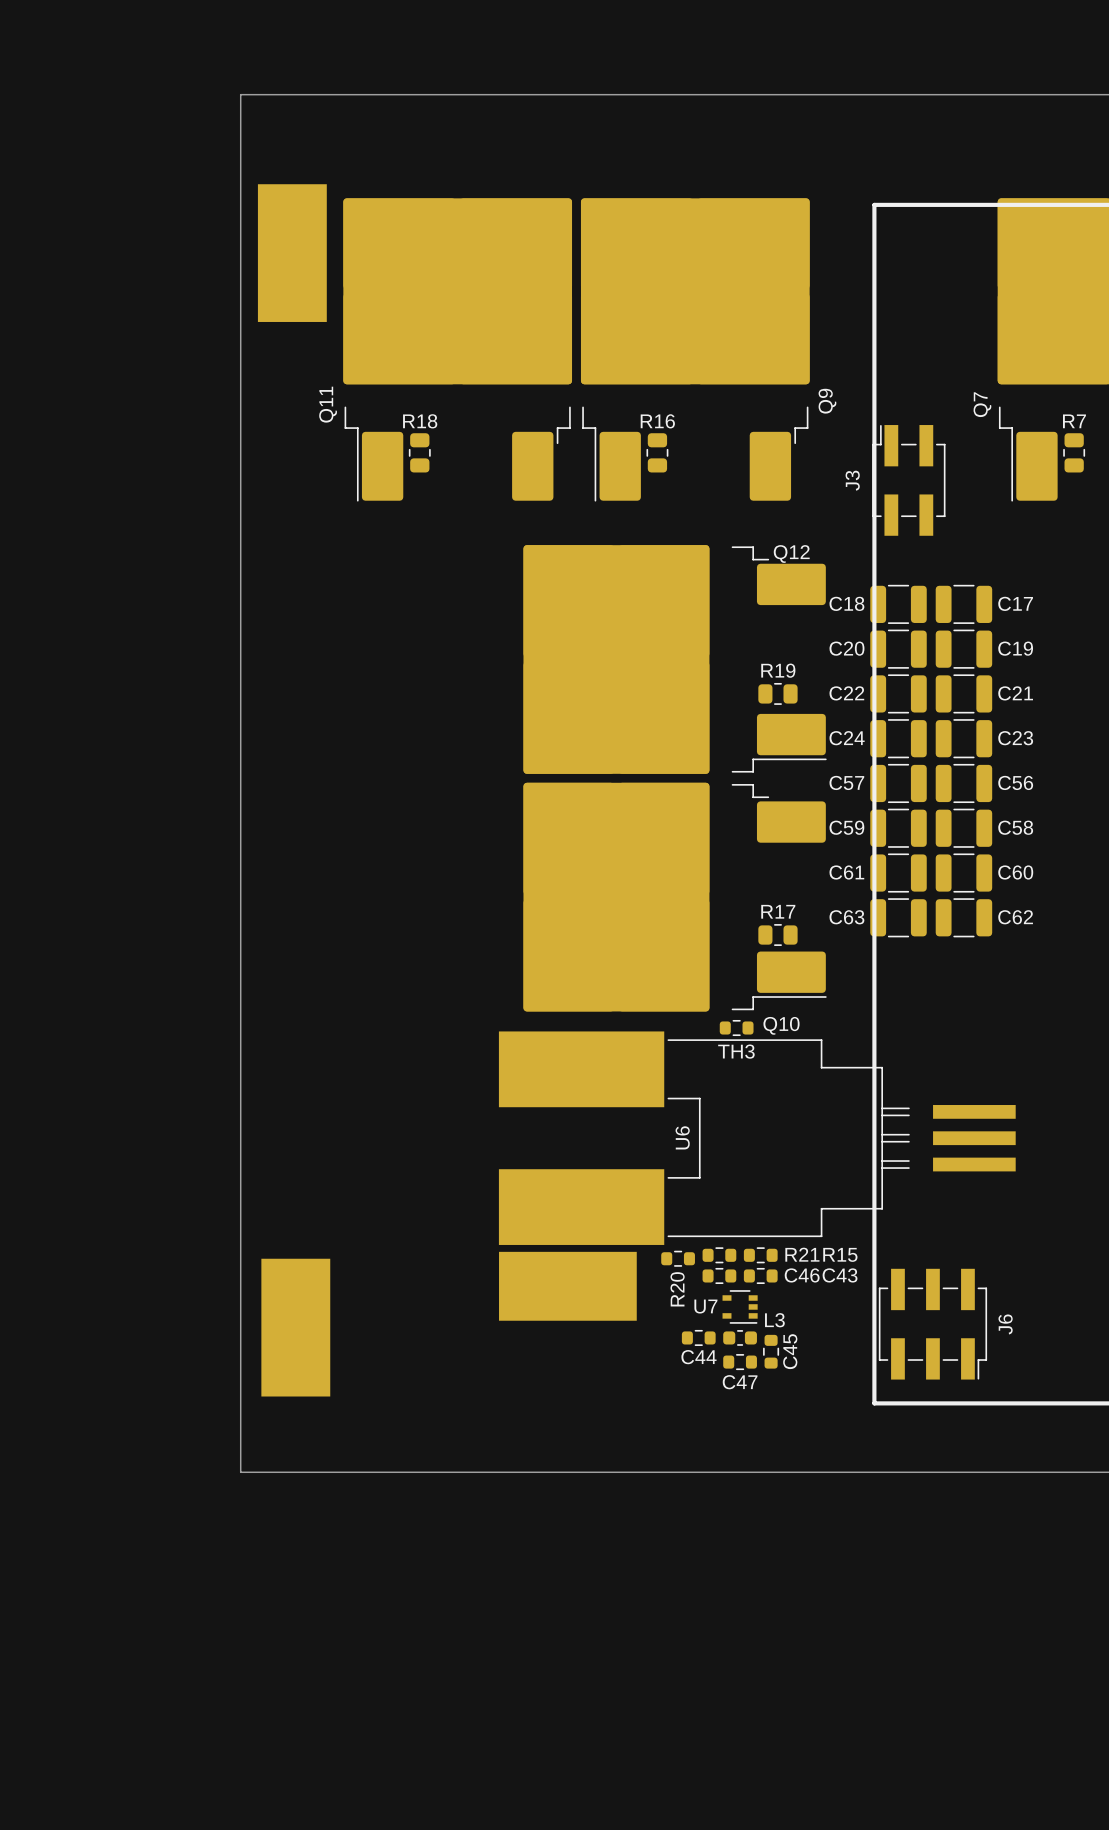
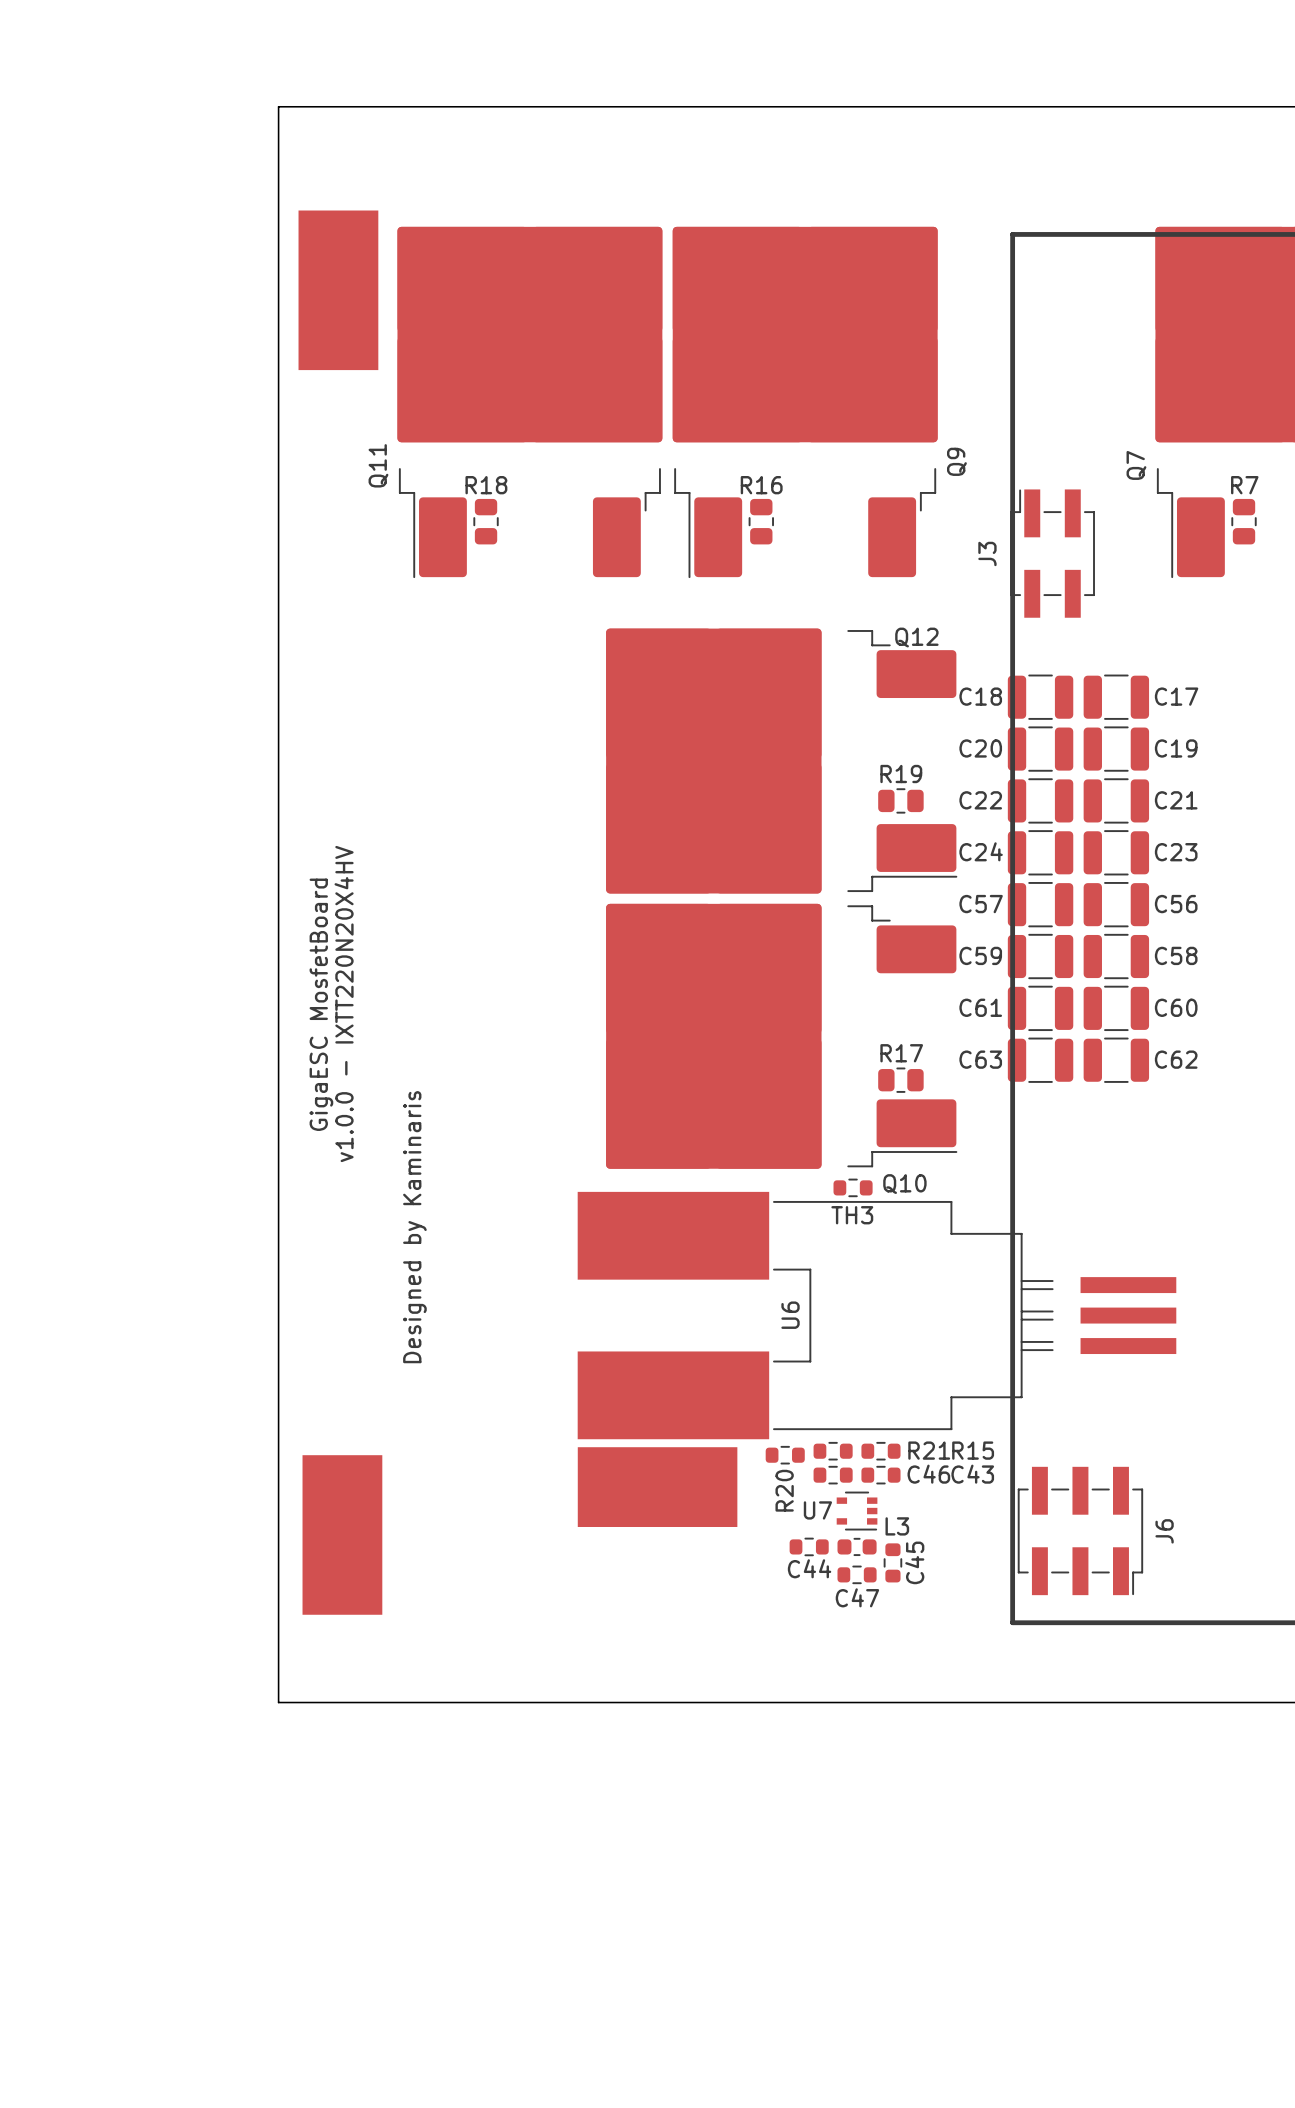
text: none -> GigaESC MosfetBoard (321, 1004)
text: none -> v1.0.0 - IXTT220N20X4HV (344, 1004)
text: none -> Designed by Kaminaris (414, 1227)

